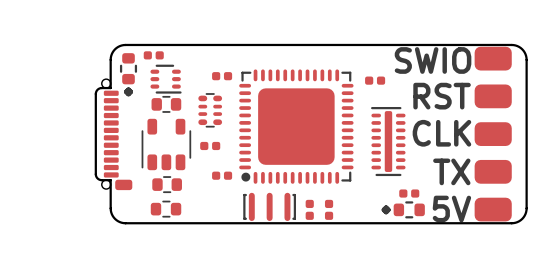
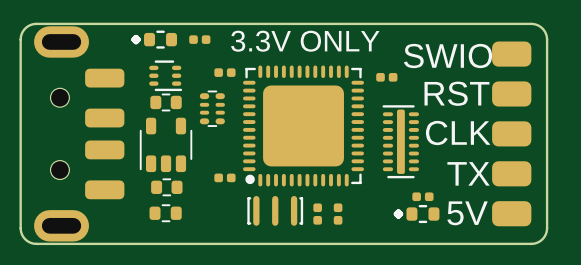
text: none -> 3.3V ONLY (305, 41)
part footprint: [143, 51, 164, 60] -> [131, 30, 178, 49]
board edge: (526, 59) (522, 49) (511, 44) (121, 45) (115, 49) (111, 55) (110, 88) (100, 88) (96, 92) (95, 174) (99, 179) (110, 180) (111, 212) (115, 218) (123, 223) (511, 223) (522, 218) (526, 208) -> (547, 55) (544, 31) (539, 26) (531, 23) (36, 23) (25, 28) (20, 39) (20, 228) (23, 237) (32, 243) (531, 243) (539, 241) (544, 236) (547, 212)
part: (128, 74) -> none
part: none -> (79, 133)
part: (117, 134) -> none
part position: (210, 145) -> (199, 39)

